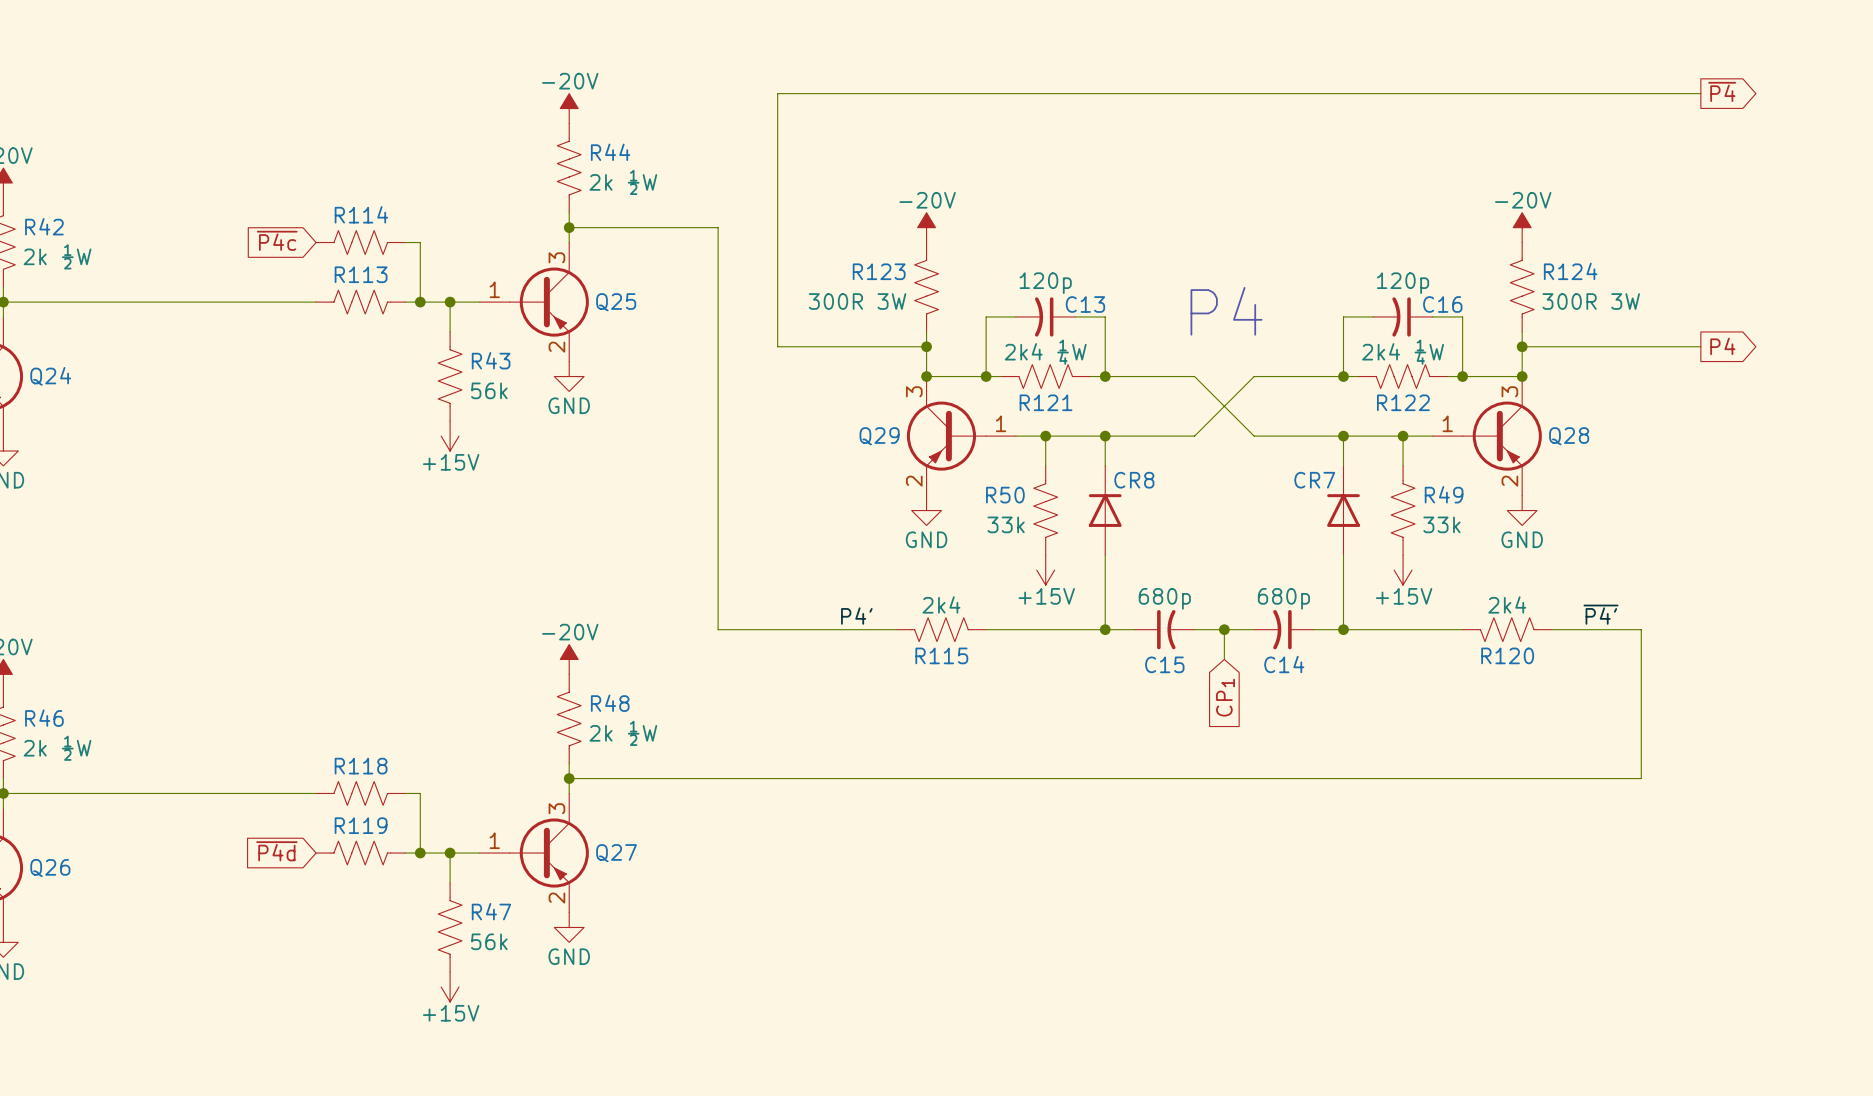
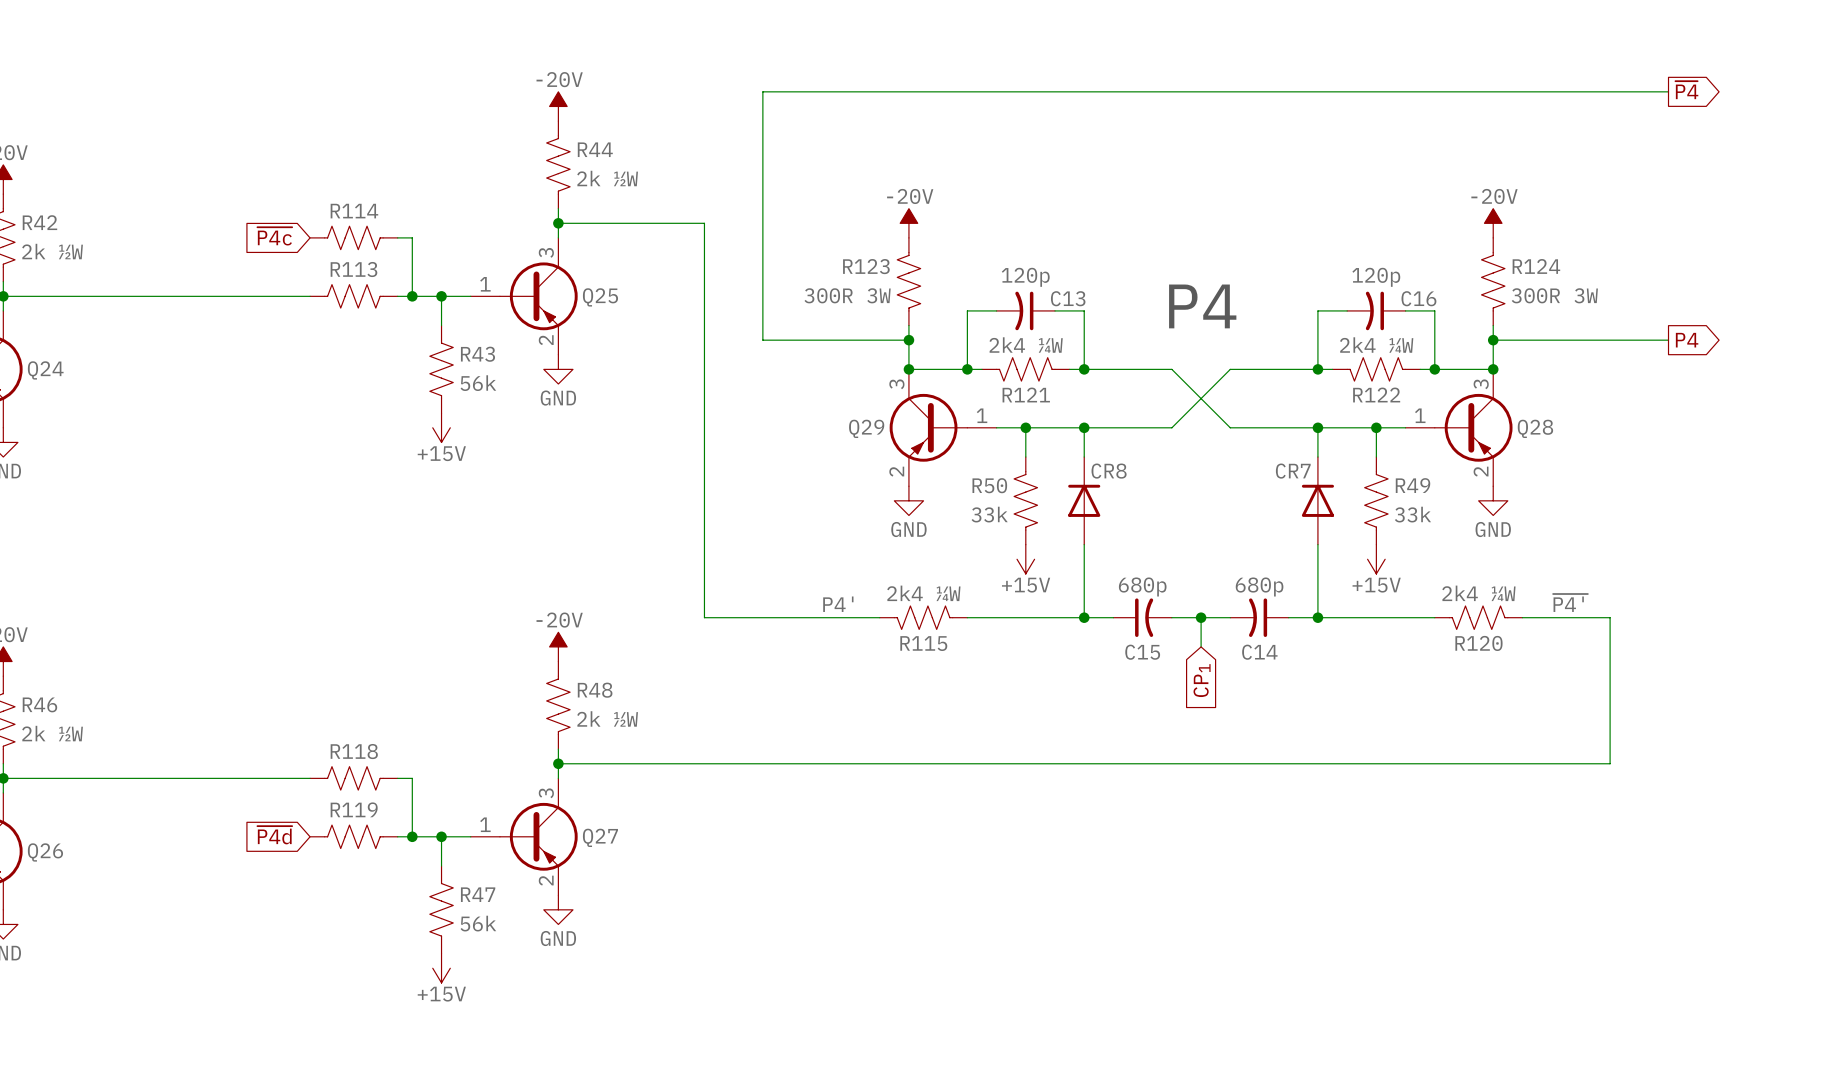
R115 value: 2k4 (941, 604) -> 2k4 ¼W (923, 593)
R120 value: 2k4 (1507, 604) -> 2k4 ¼W (1478, 593)

